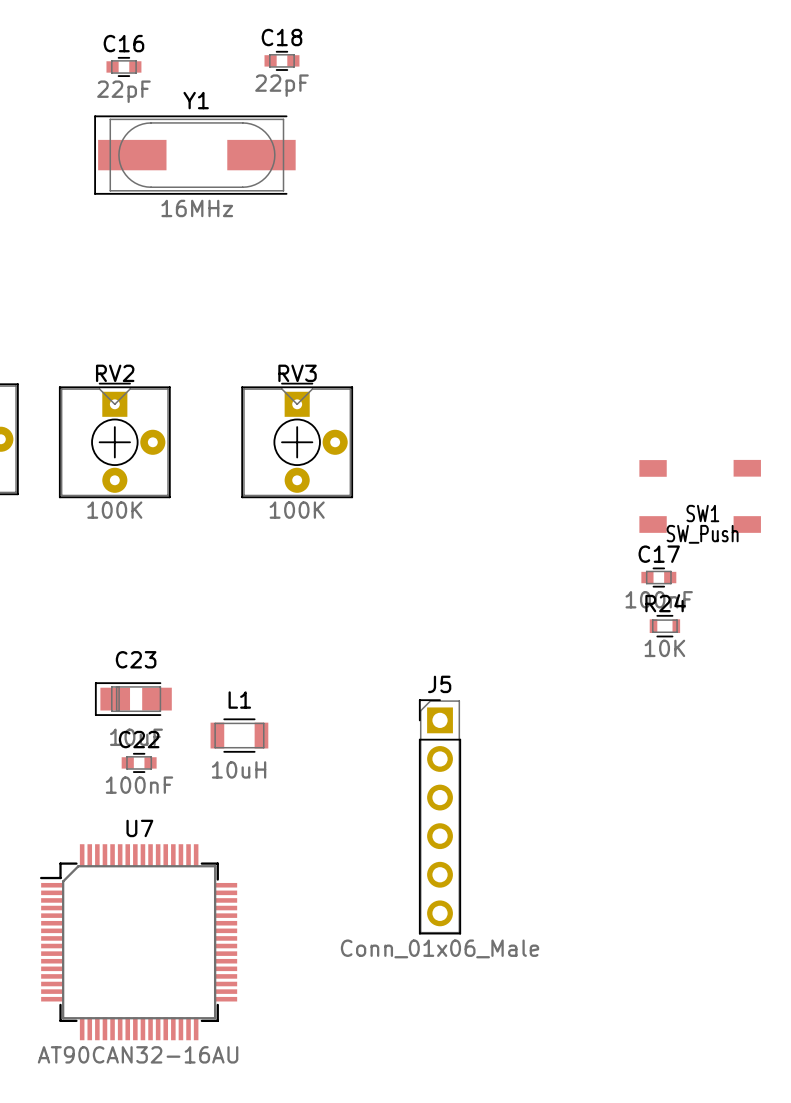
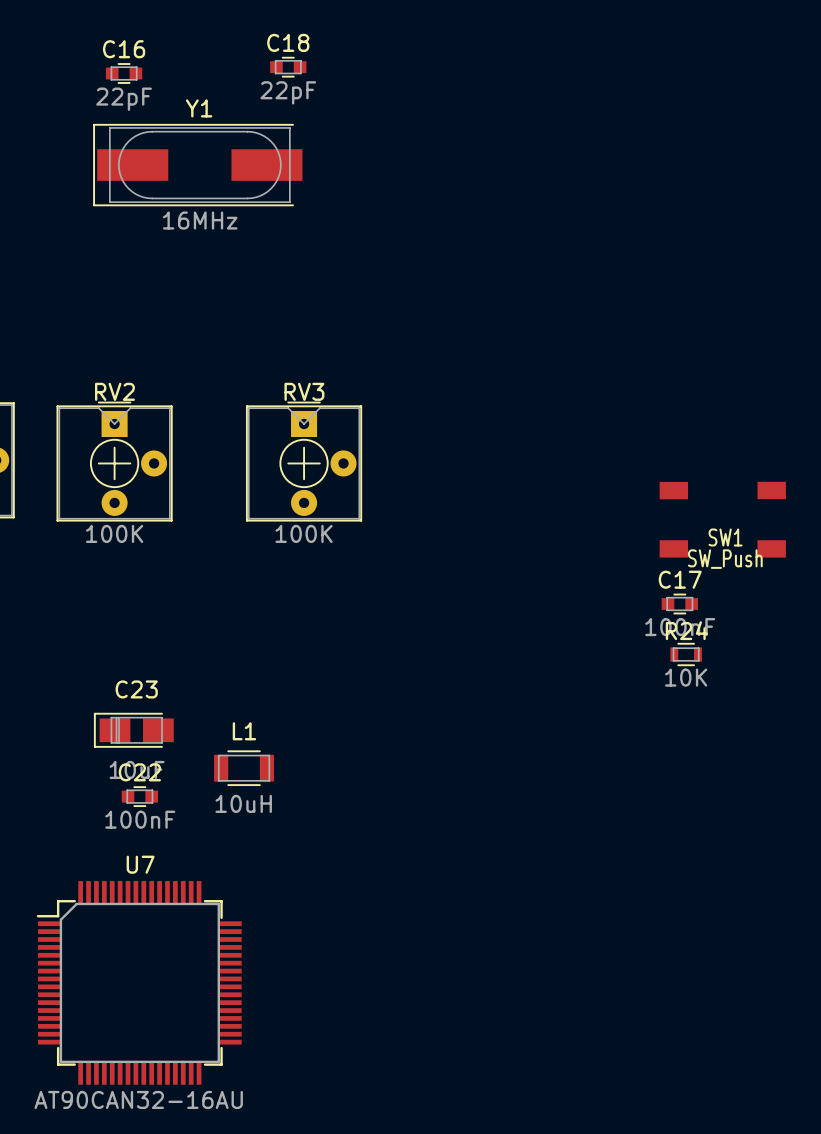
J5: Conn_01x06_Male (440, 816) -> none

